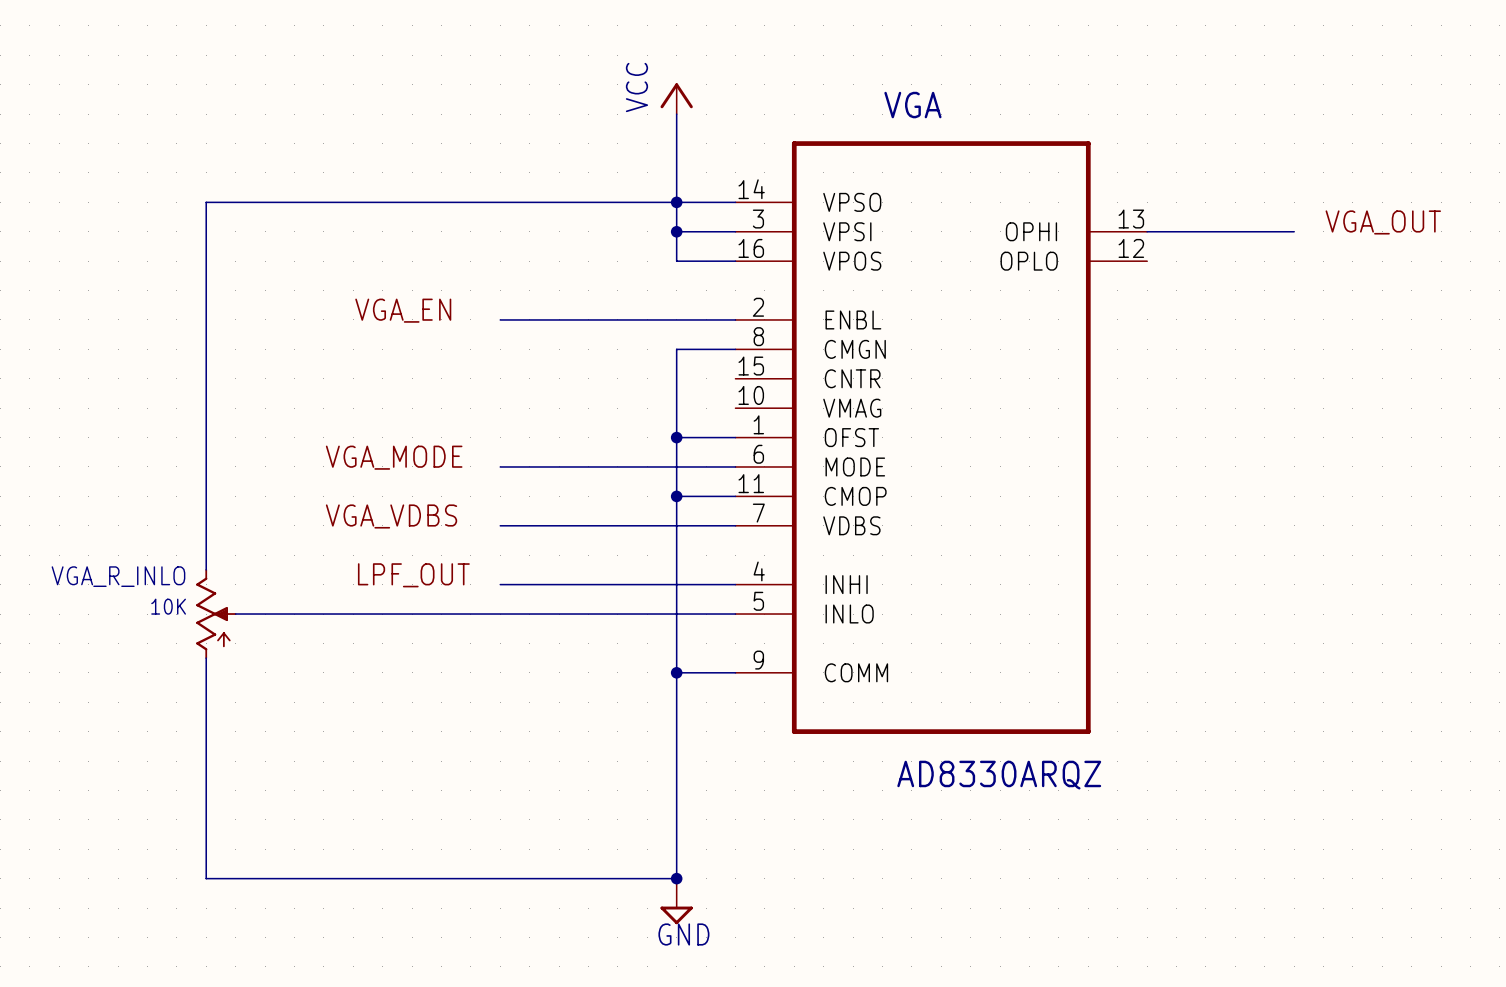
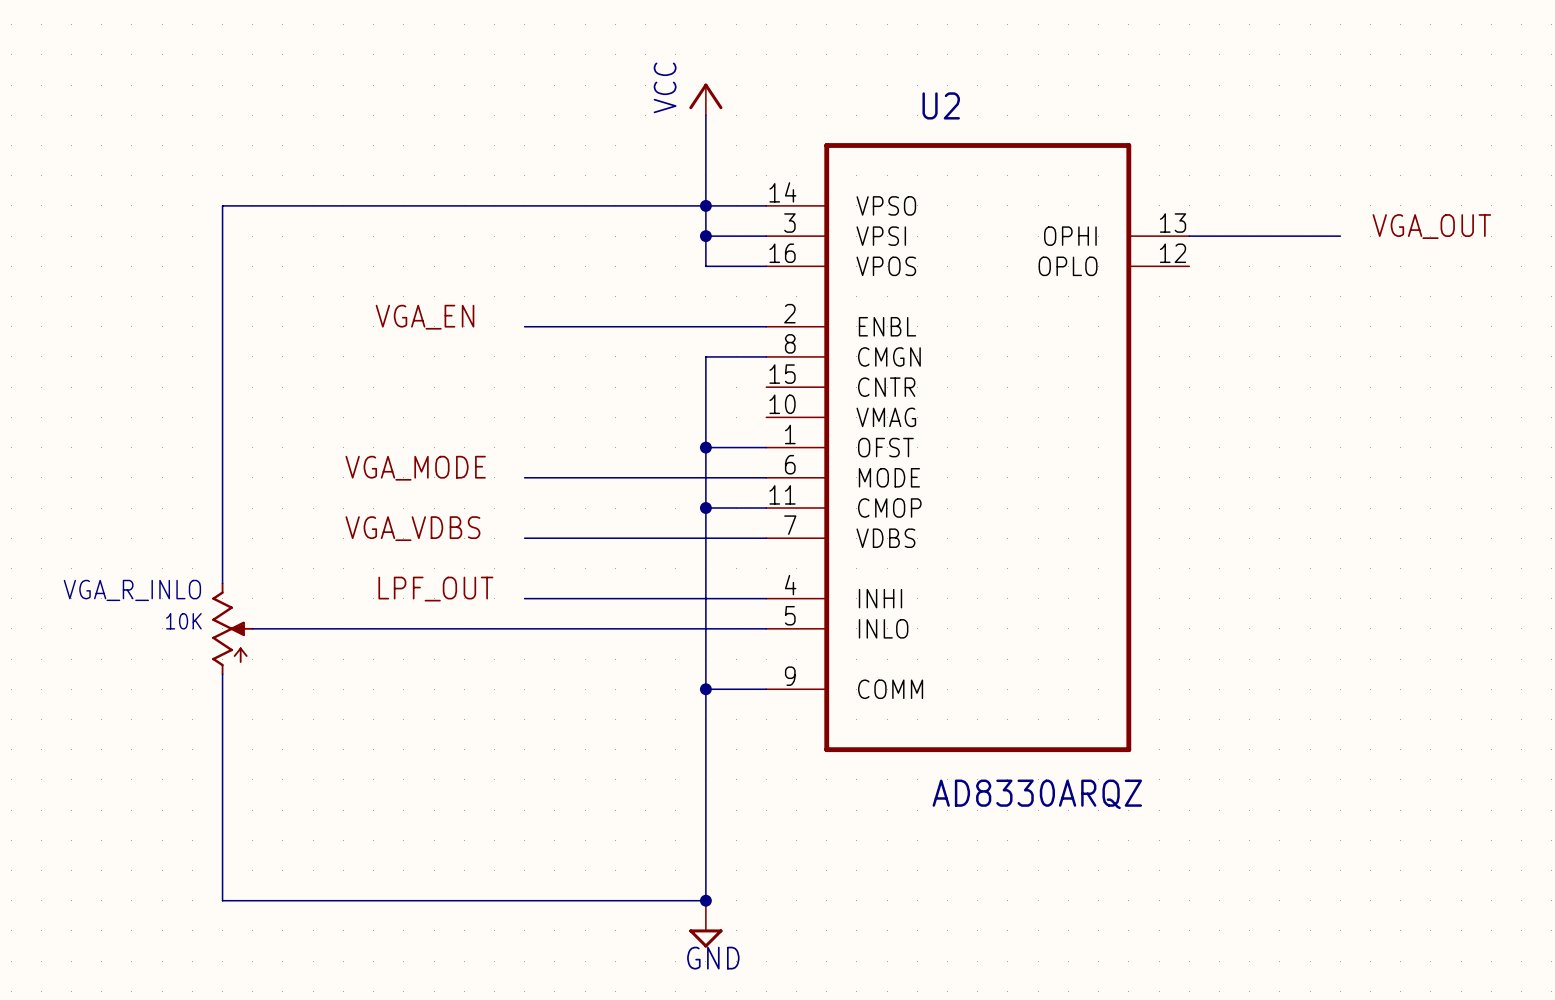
VGA name: VGA (912, 105) -> U2 (941, 105)

